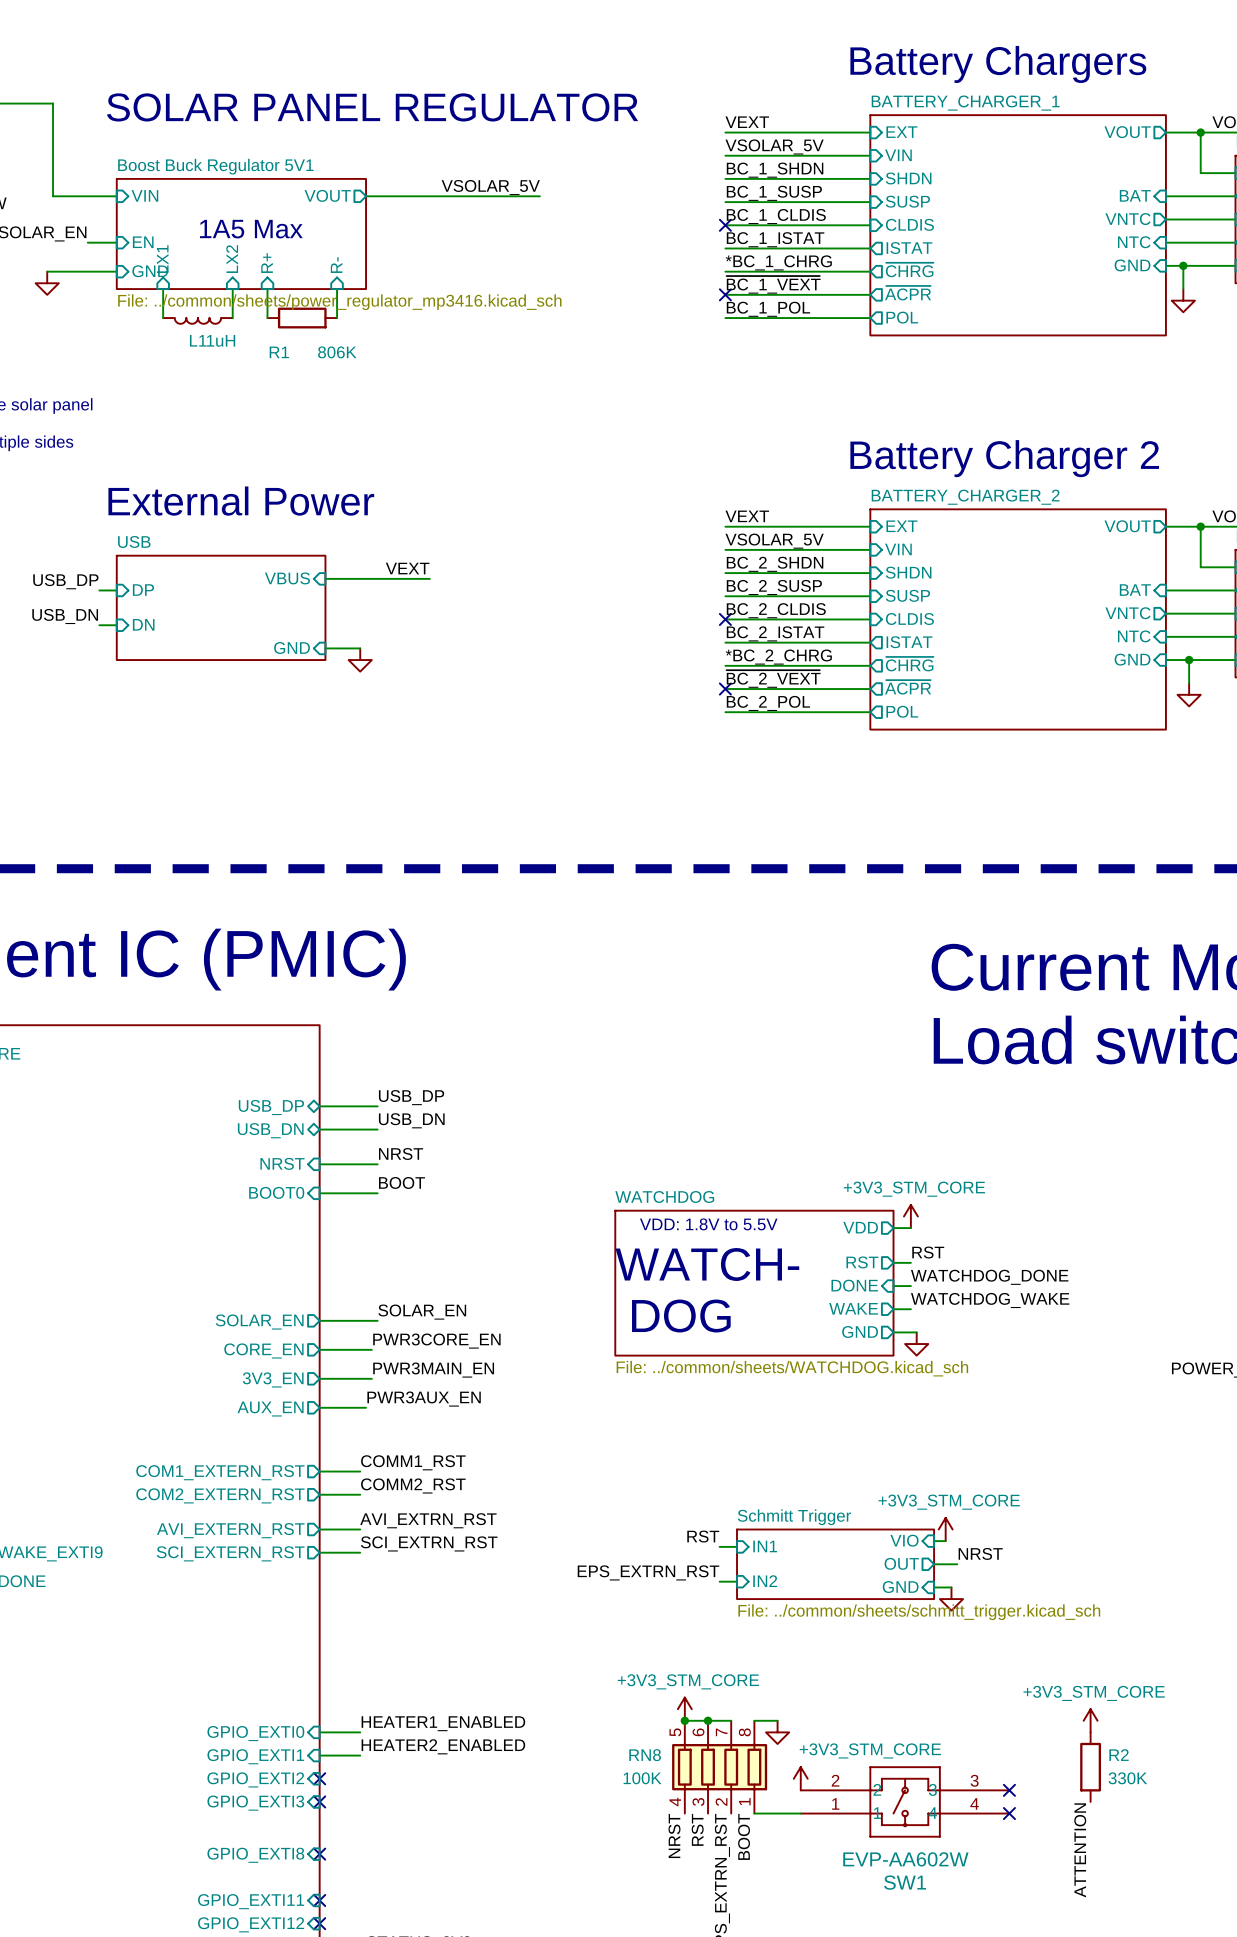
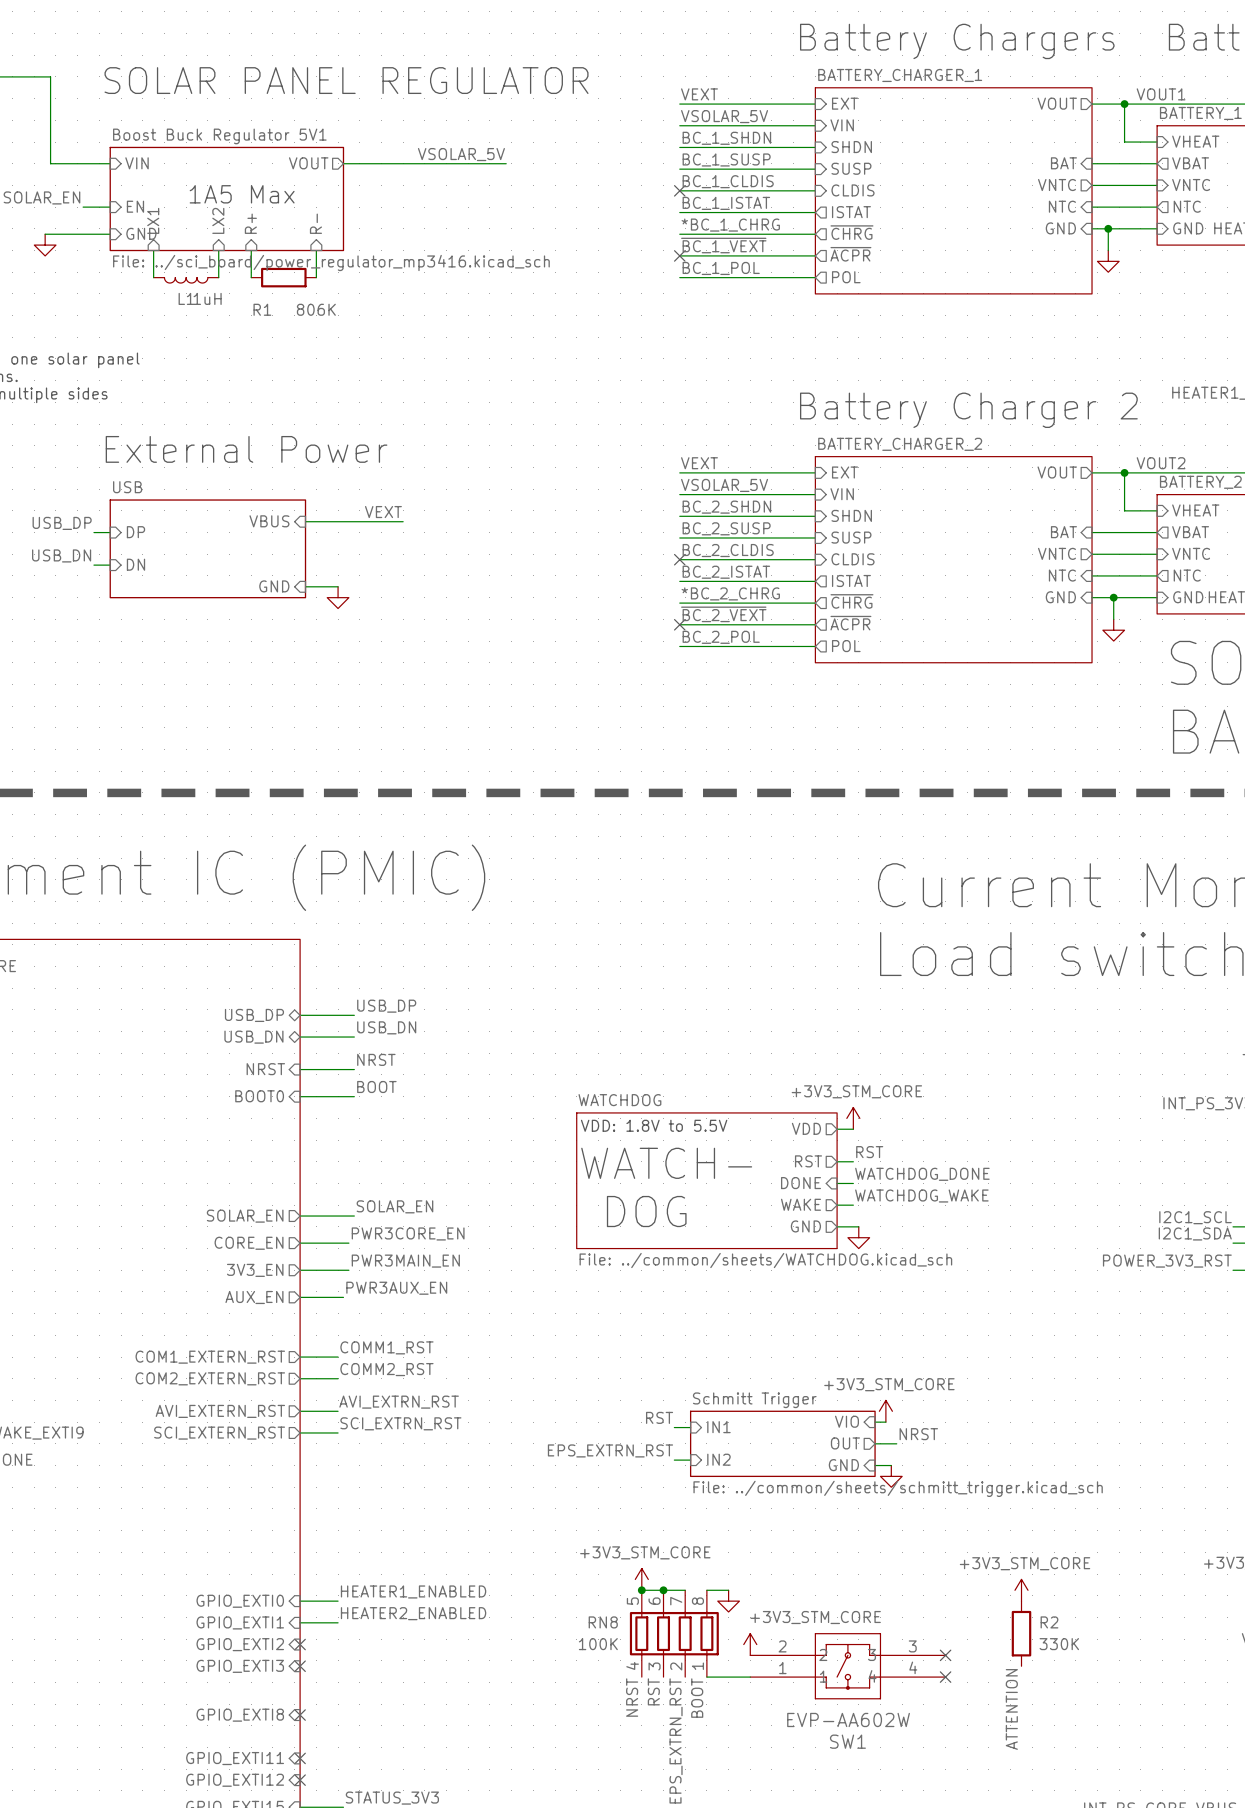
sheet Boost Buck Regulator 5V1 value: File: ../common/sheets/power_regulator_mp3416.kicad_sch (339, 302) -> File: ../sci_board/power_regulator_mp3416.kicad_sch (331, 262)

